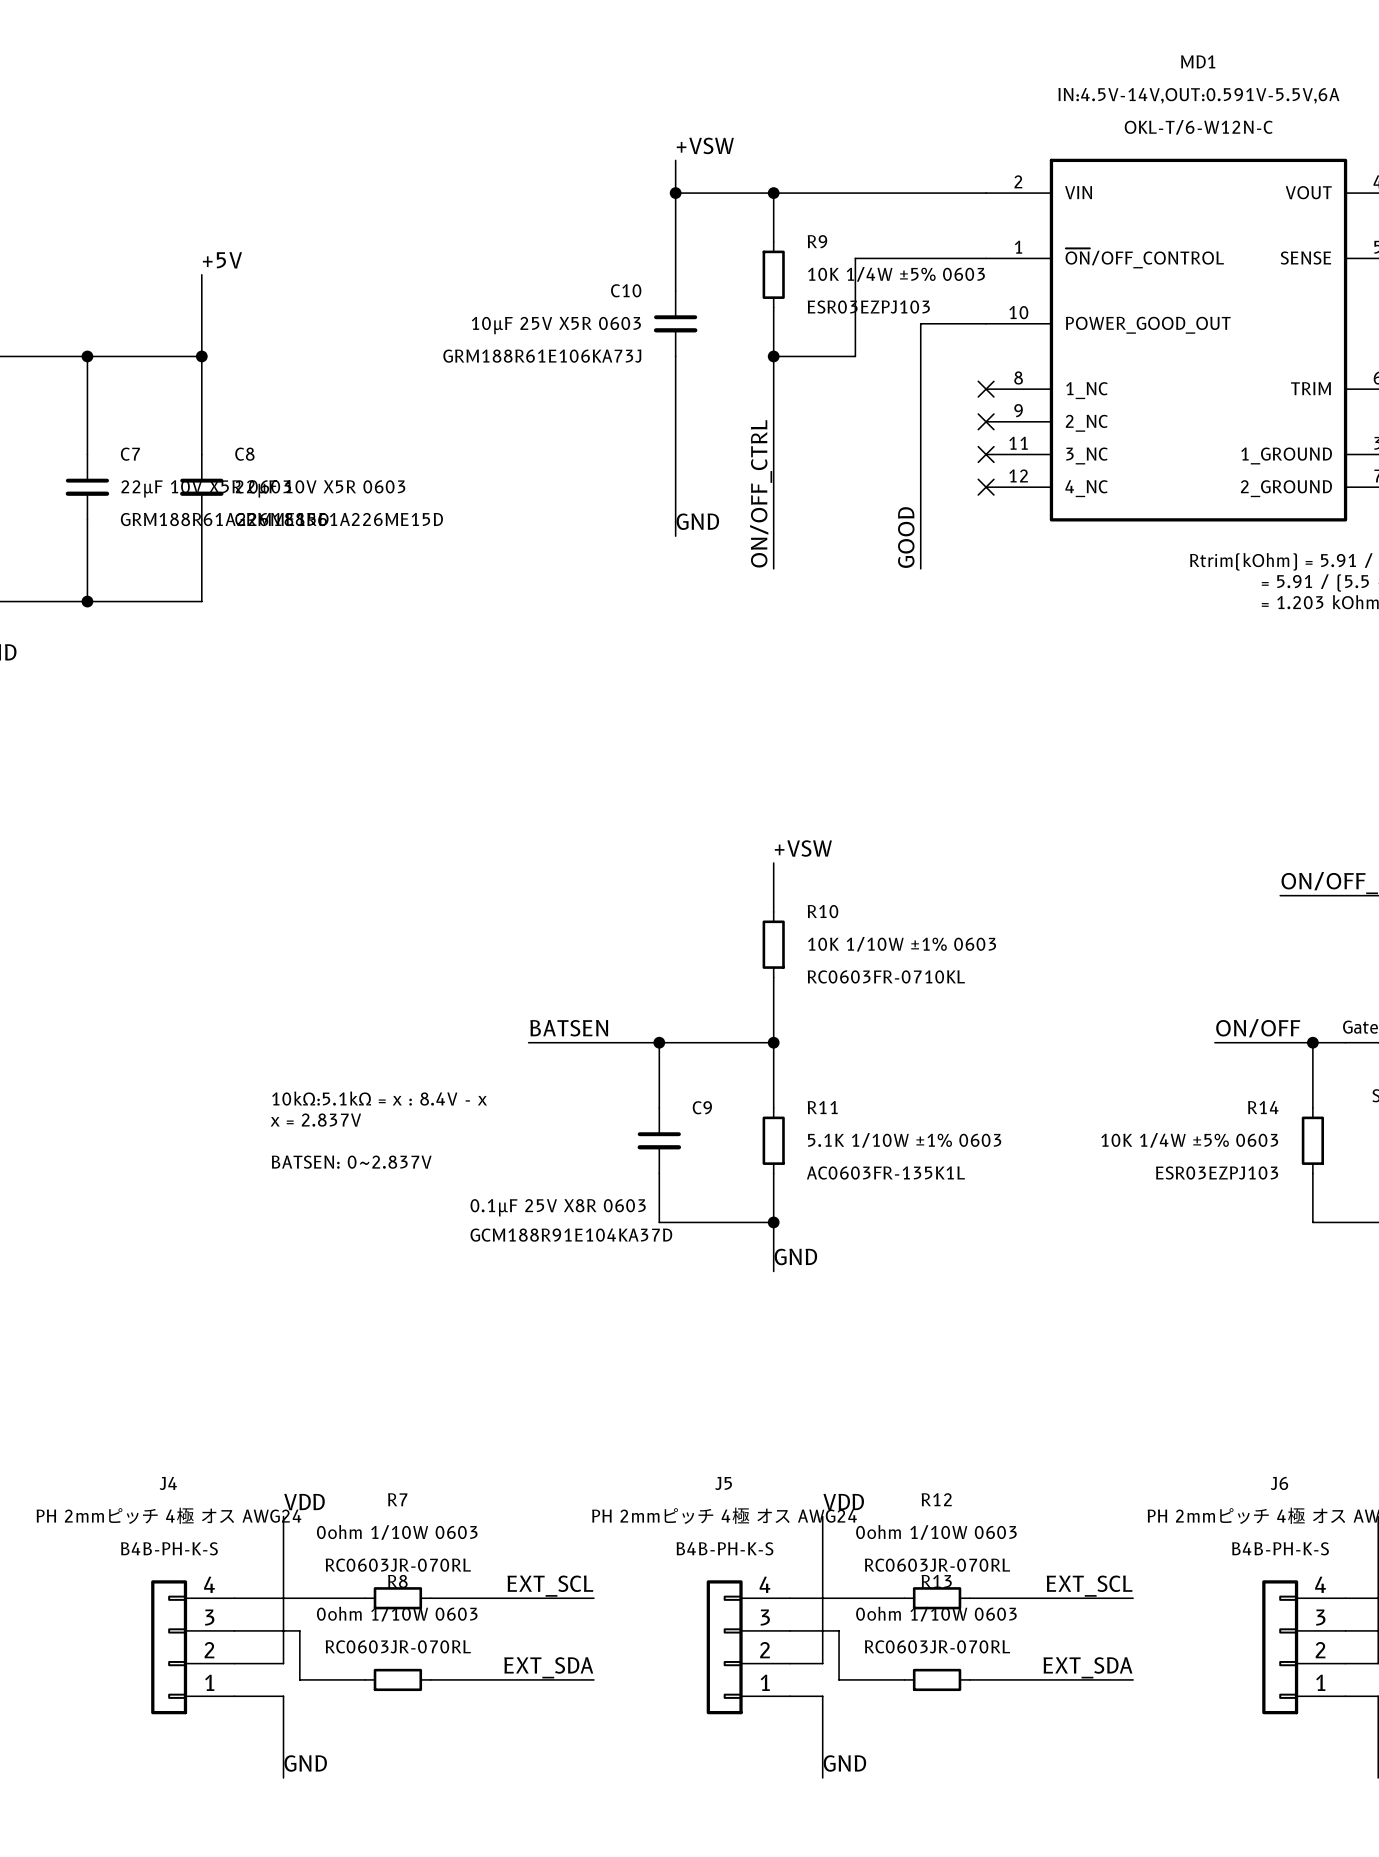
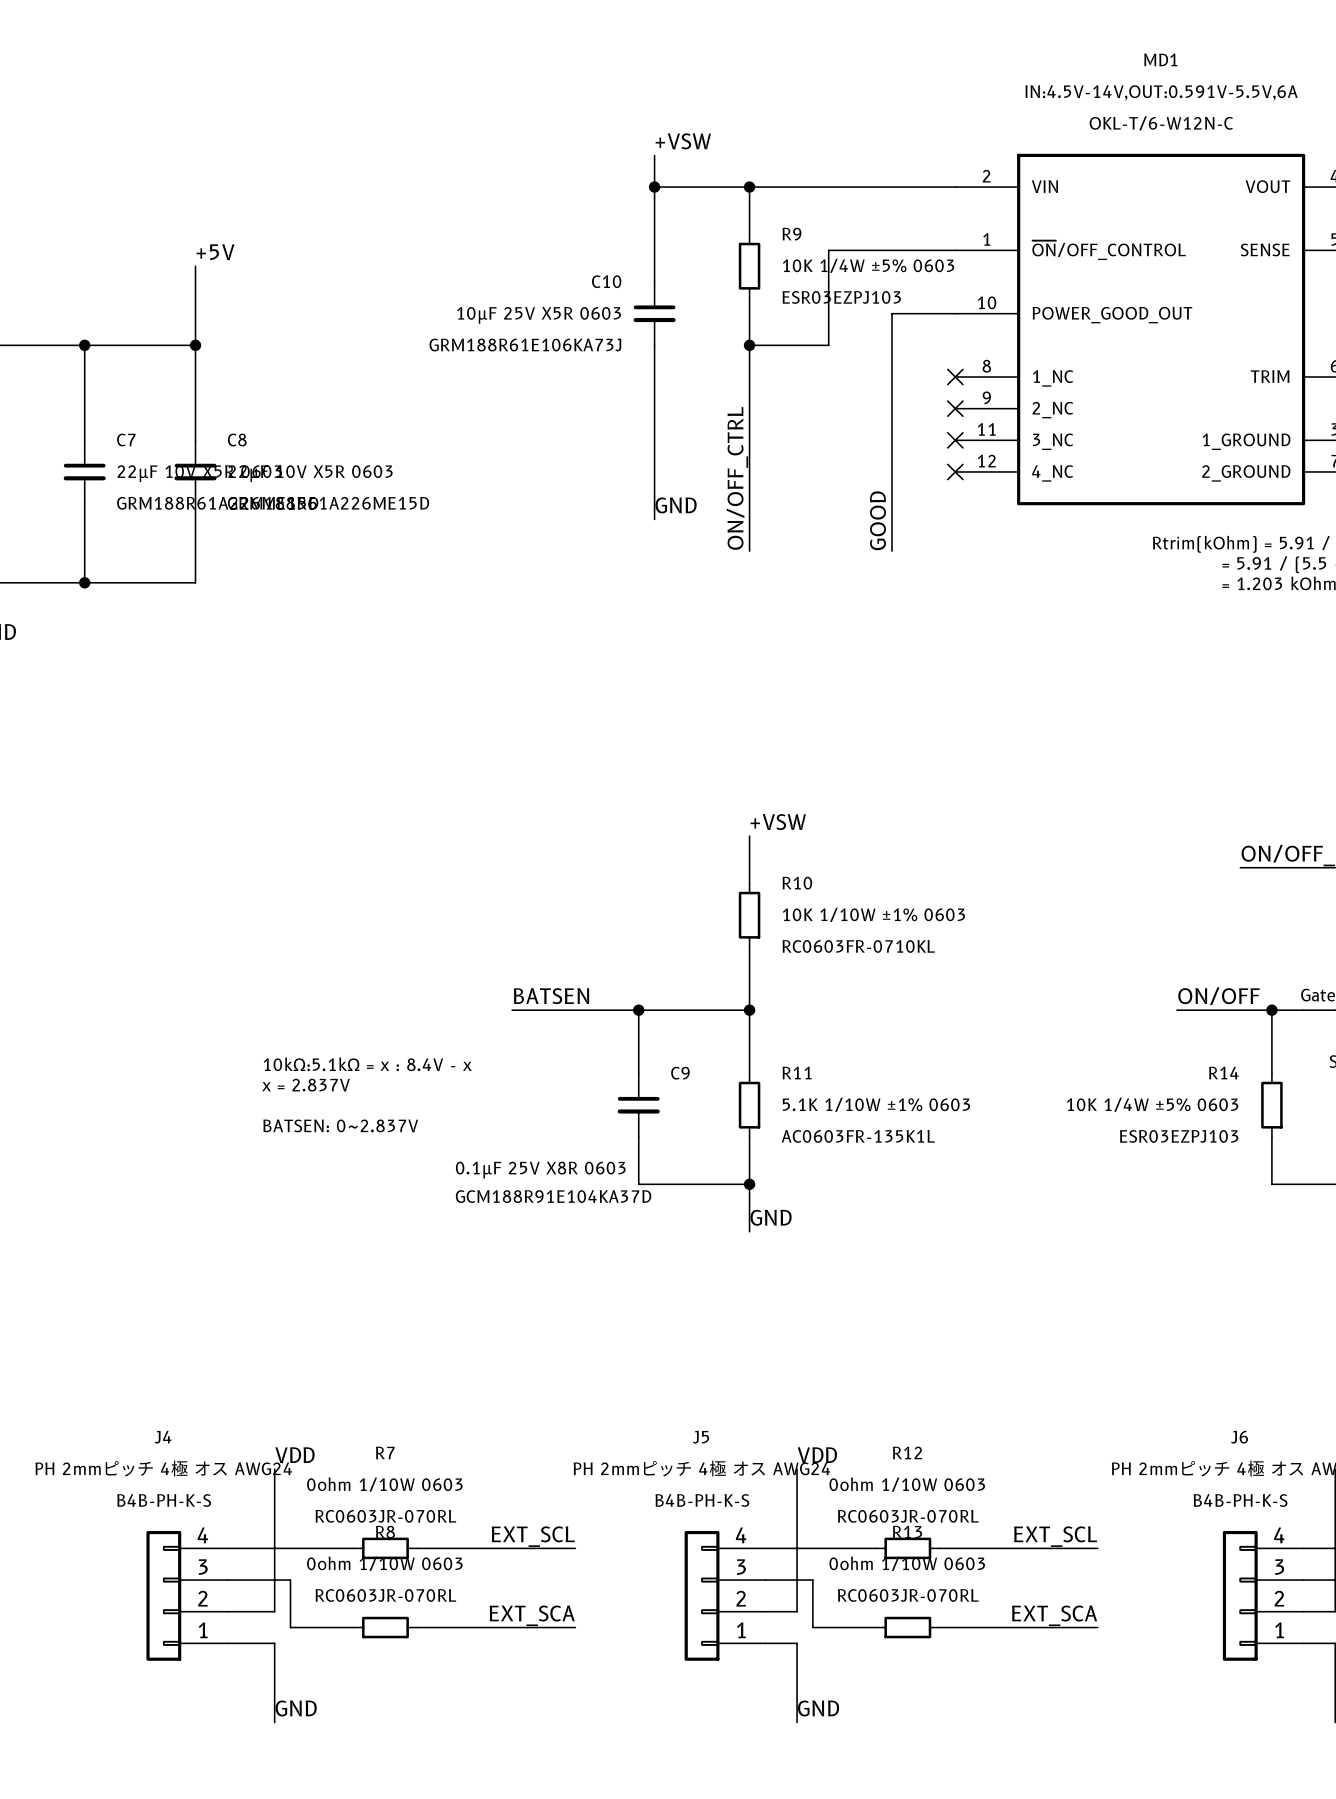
label: EXT_SDA (548, 1667) -> EXT_SCA (532, 1615)
label: EXT_SDA (1087, 1667) -> EXT_SCA (1054, 1615)

